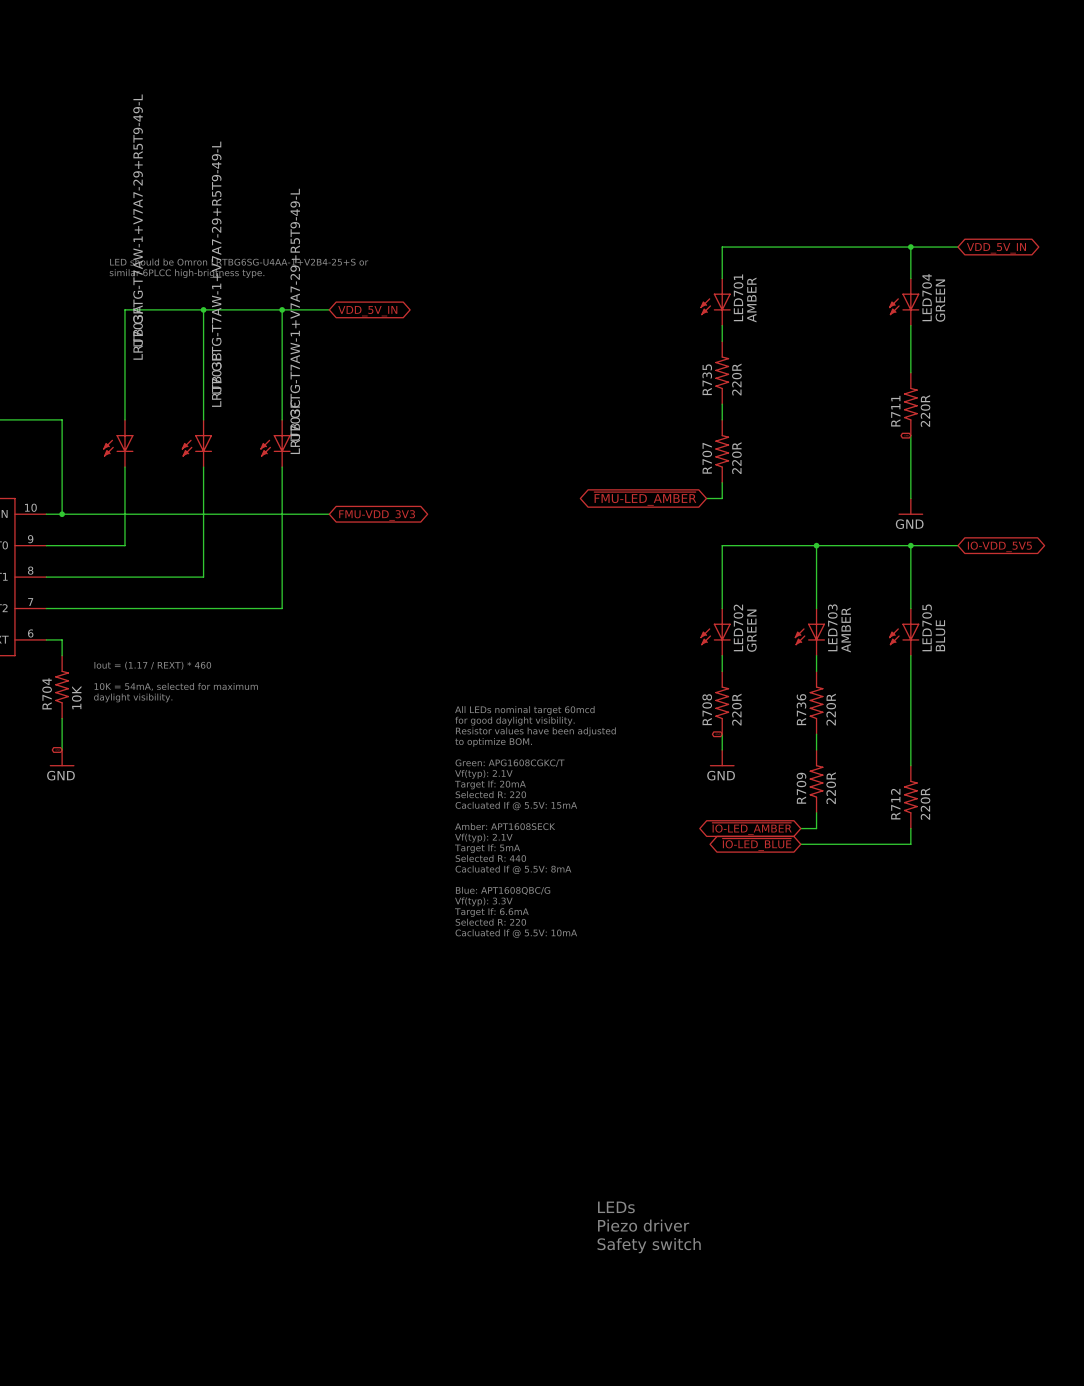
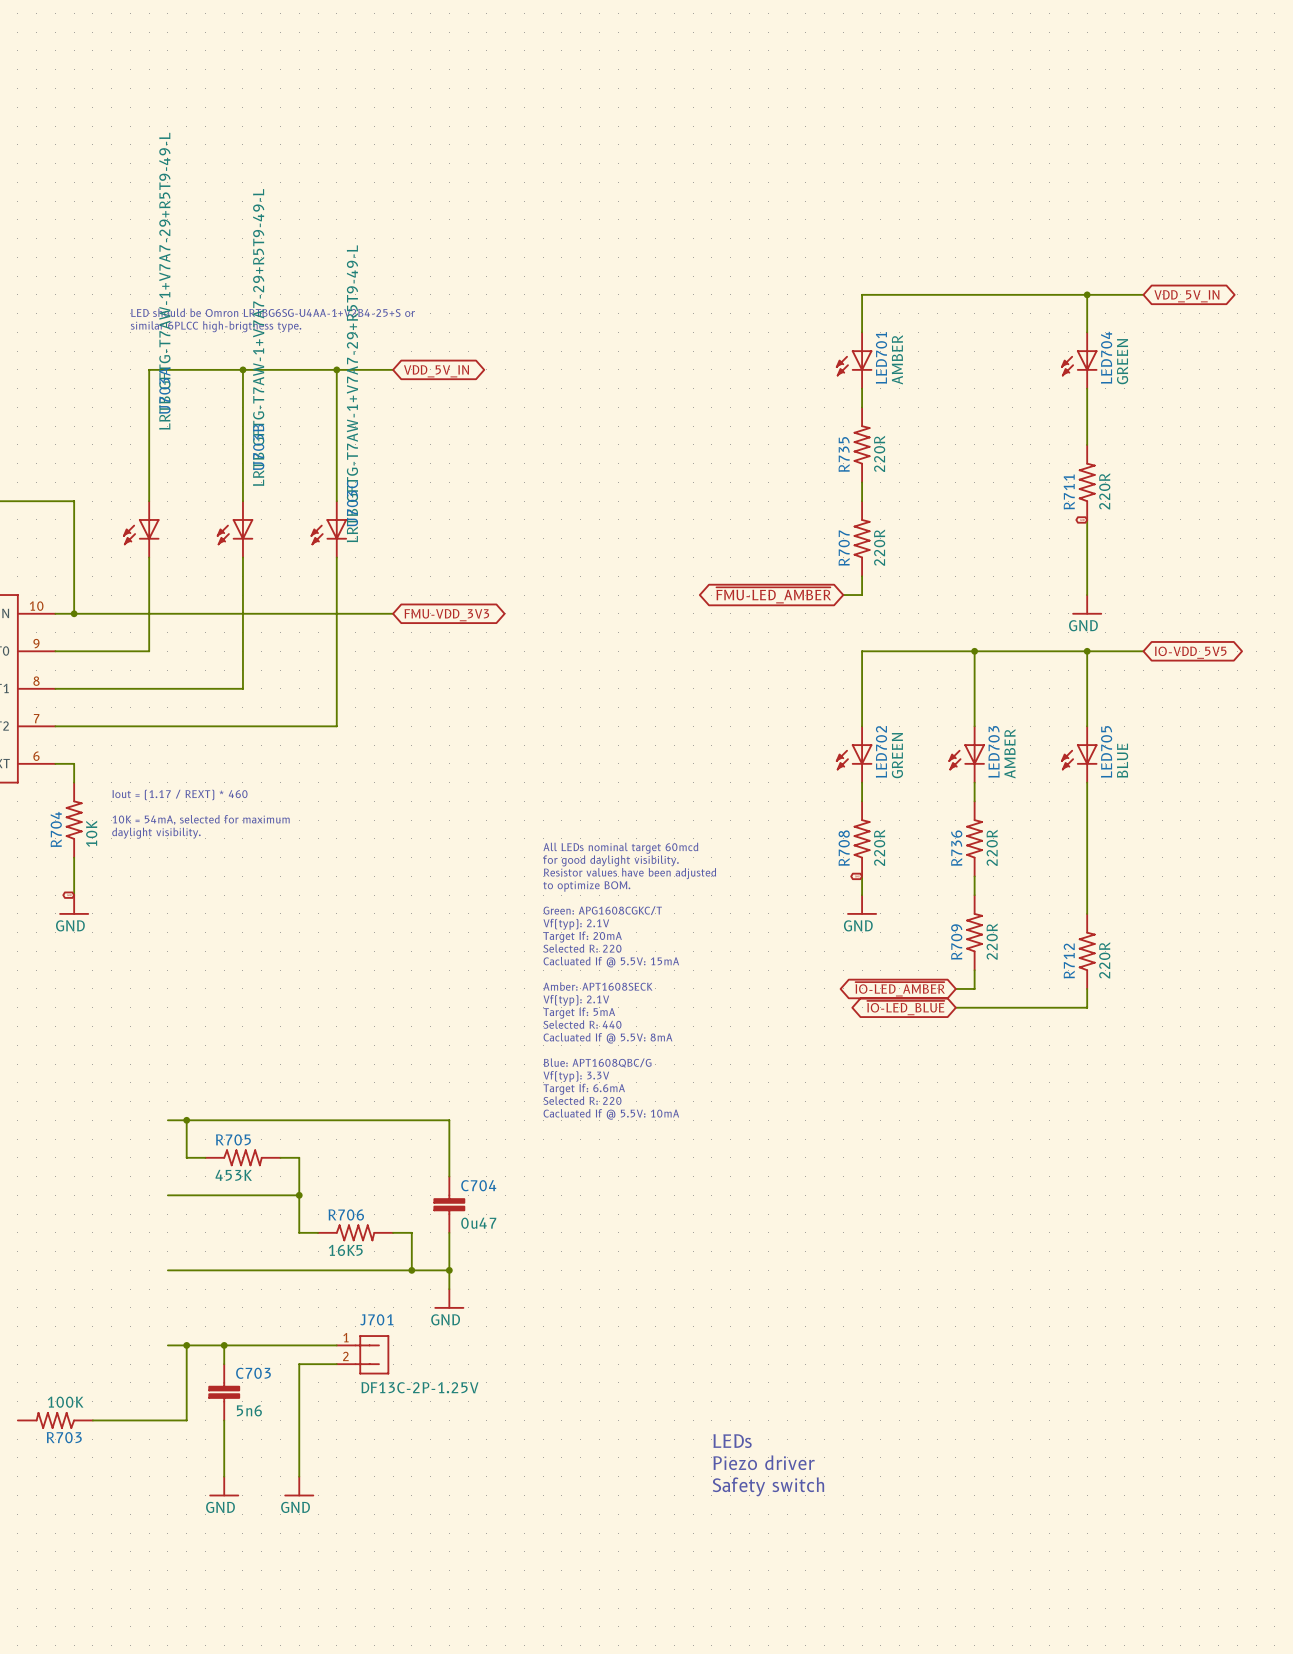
wire: none -> (167, 1120) (449, 1120) (449, 1176)
wire: none -> (186, 1120) (186, 1157) (205, 1157)
junction: none -> (186, 1120)
R705: none -> 453K (242, 1157)
wire: none -> (280, 1157) (299, 1157) (299, 1232) (318, 1232)
wire: none -> (167, 1195) (299, 1195)
junction: none -> (299, 1195)
C704: none -> 0u47 (449, 1204)
R706: none -> 16K5 (355, 1232)
wire: none -> (393, 1232) (411, 1232) (411, 1270)
wire: none -> (449, 1232) (449, 1289)
wire: none -> (167, 1270) (449, 1270)
junction: none -> (411, 1270)
junction: none -> (449, 1270)
power symbol: none -> GND (449, 1298)
wire: none -> (167, 1345) (336, 1345)
wire: none -> (186, 1345) (186, 1420) (92, 1420)
junction: none -> (186, 1345)
wire: none -> (224, 1345) (224, 1364)
junction: none -> (224, 1345)
J701: none -> DF13C-2P-1.25V (362, 1354)
wire: none -> (336, 1364) (299, 1364) (299, 1476)
C703: none -> 5n6 (224, 1392)
R703: none -> 100K (55, 1420)
wire: none -> (224, 1420) (224, 1476)
power symbol: none -> GND (224, 1486)
power symbol: none -> GND (299, 1486)

